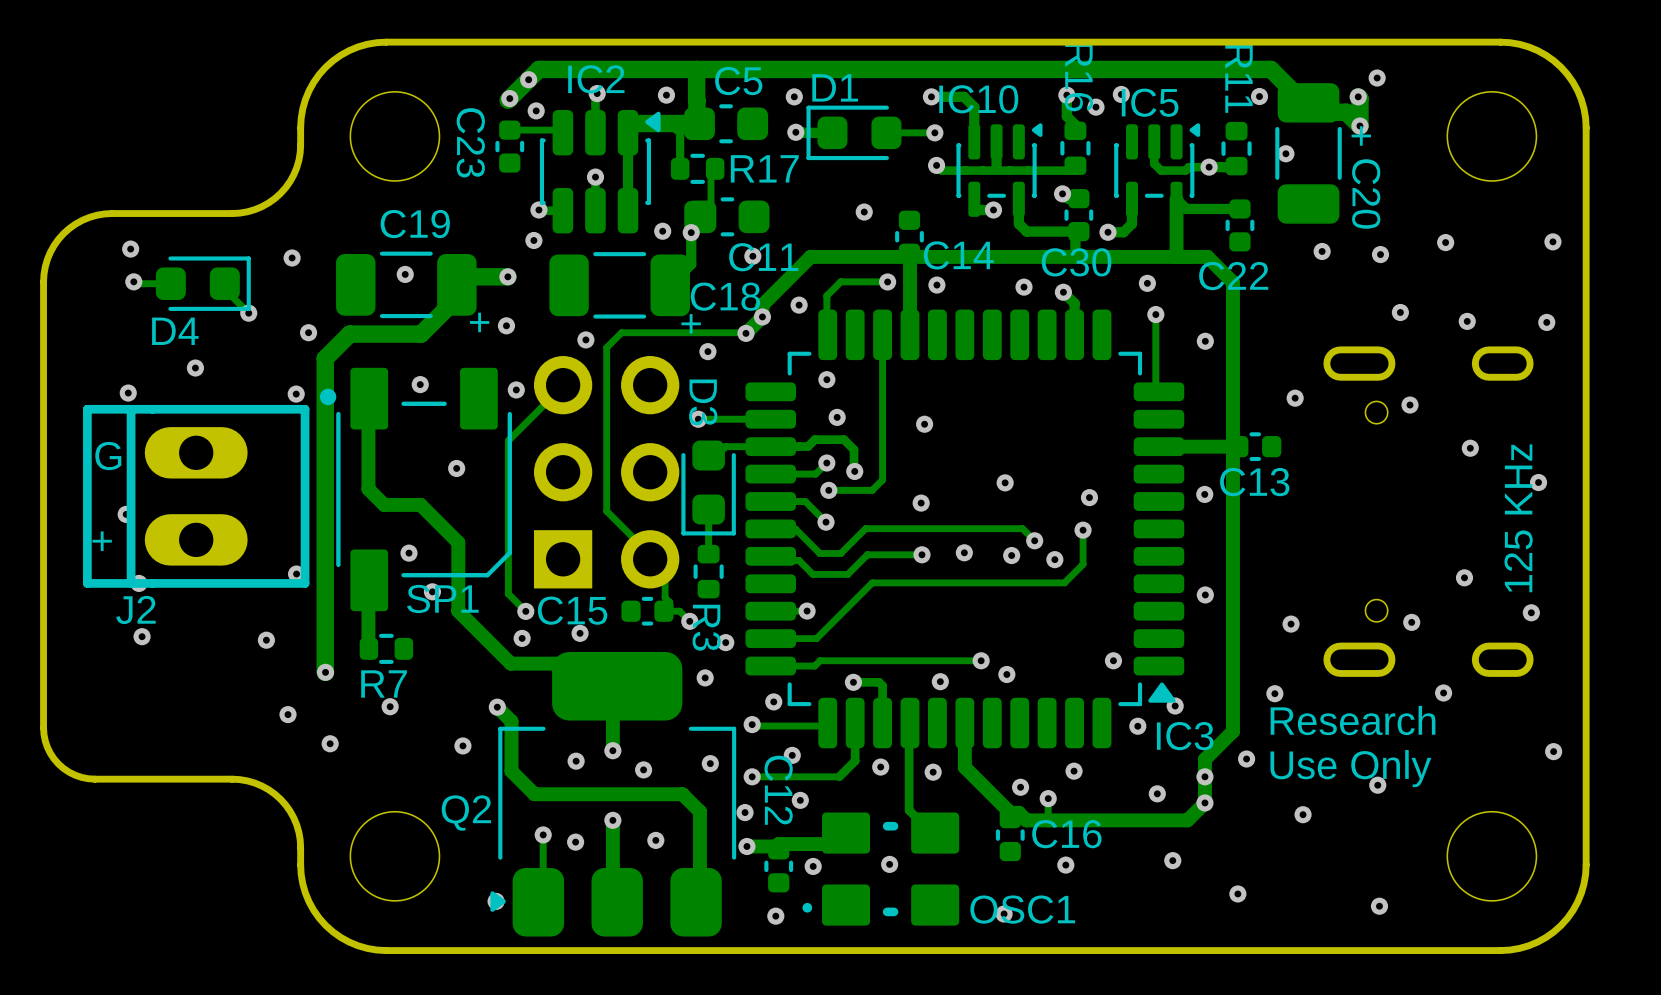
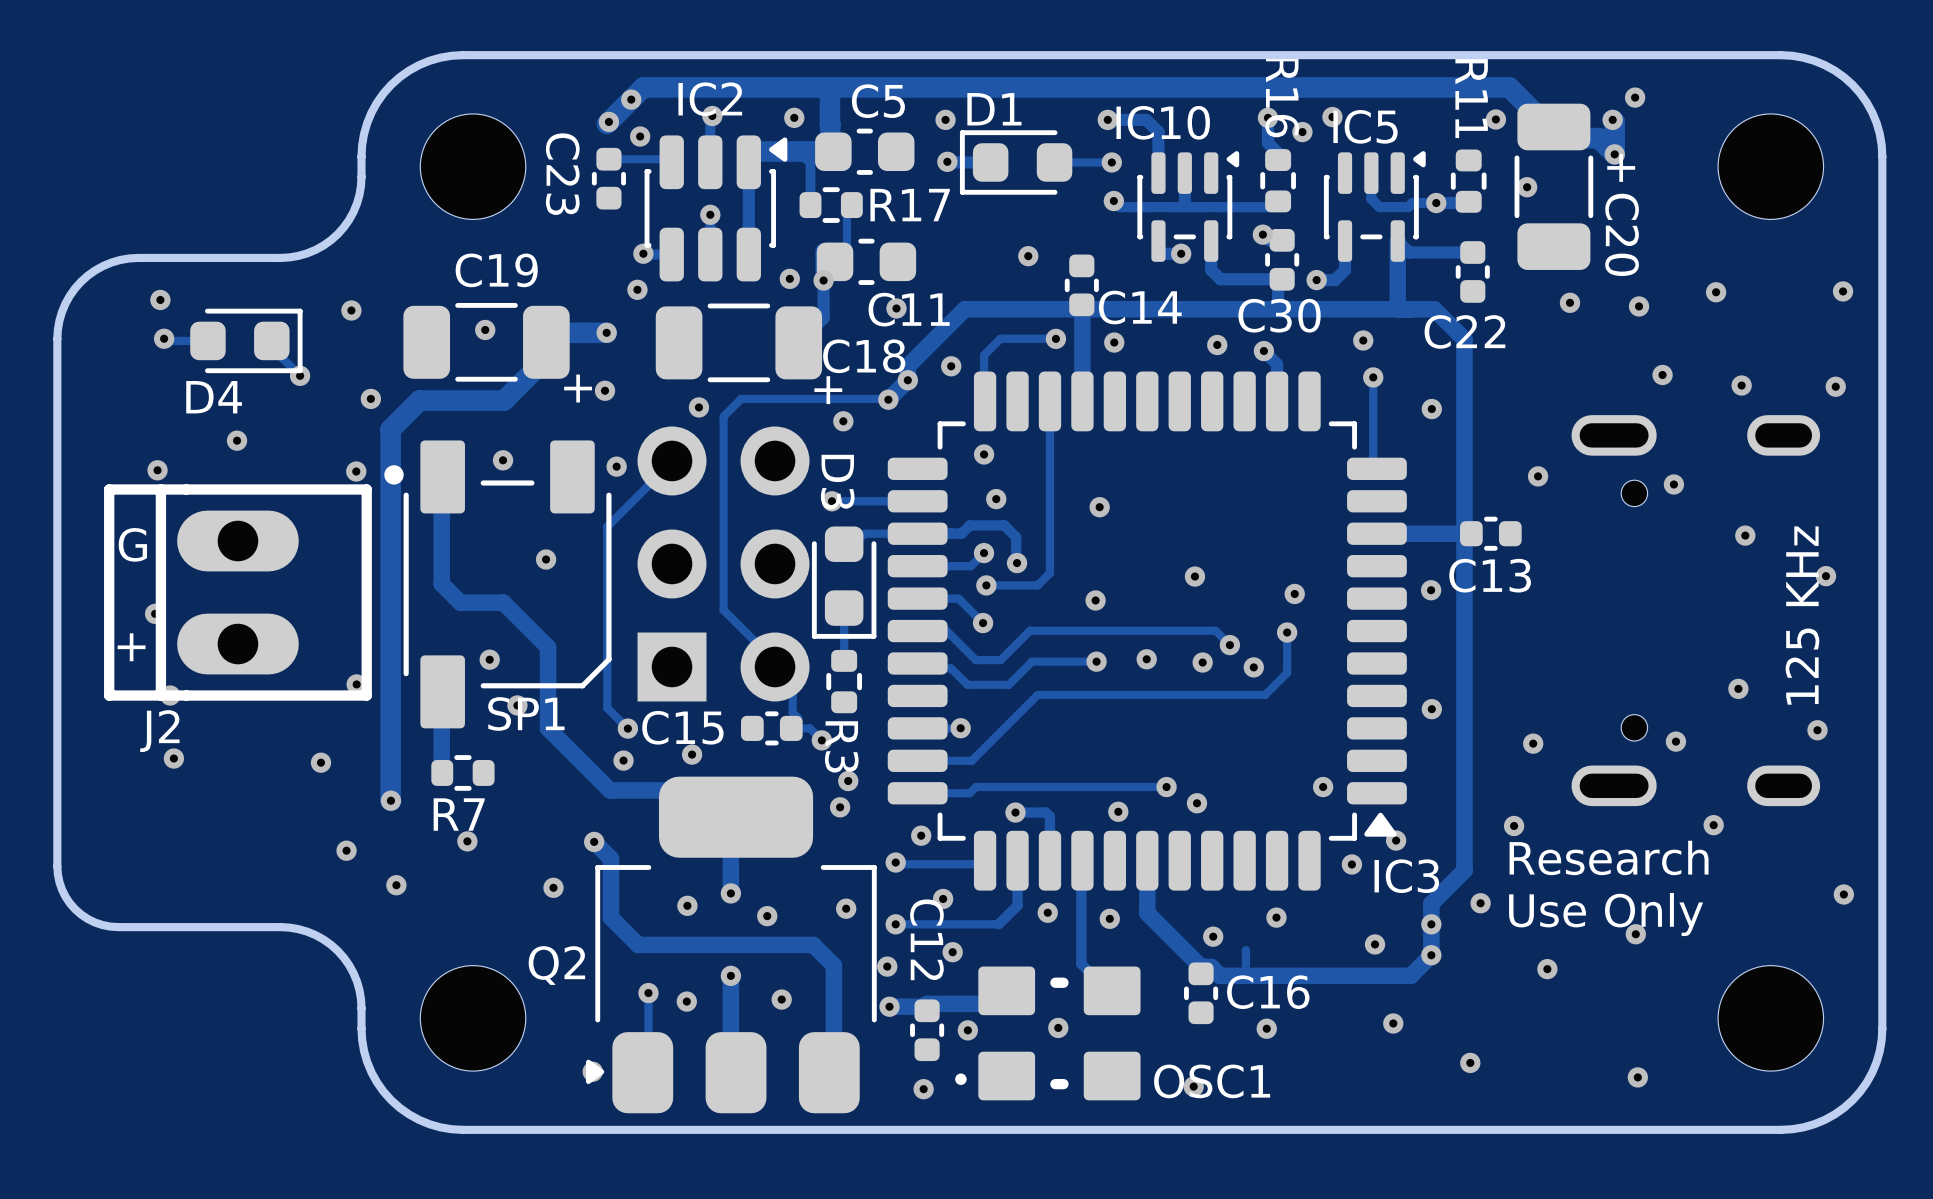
via position: (725, 642) -> (848, 781)
via: (1048, 798) -> none

